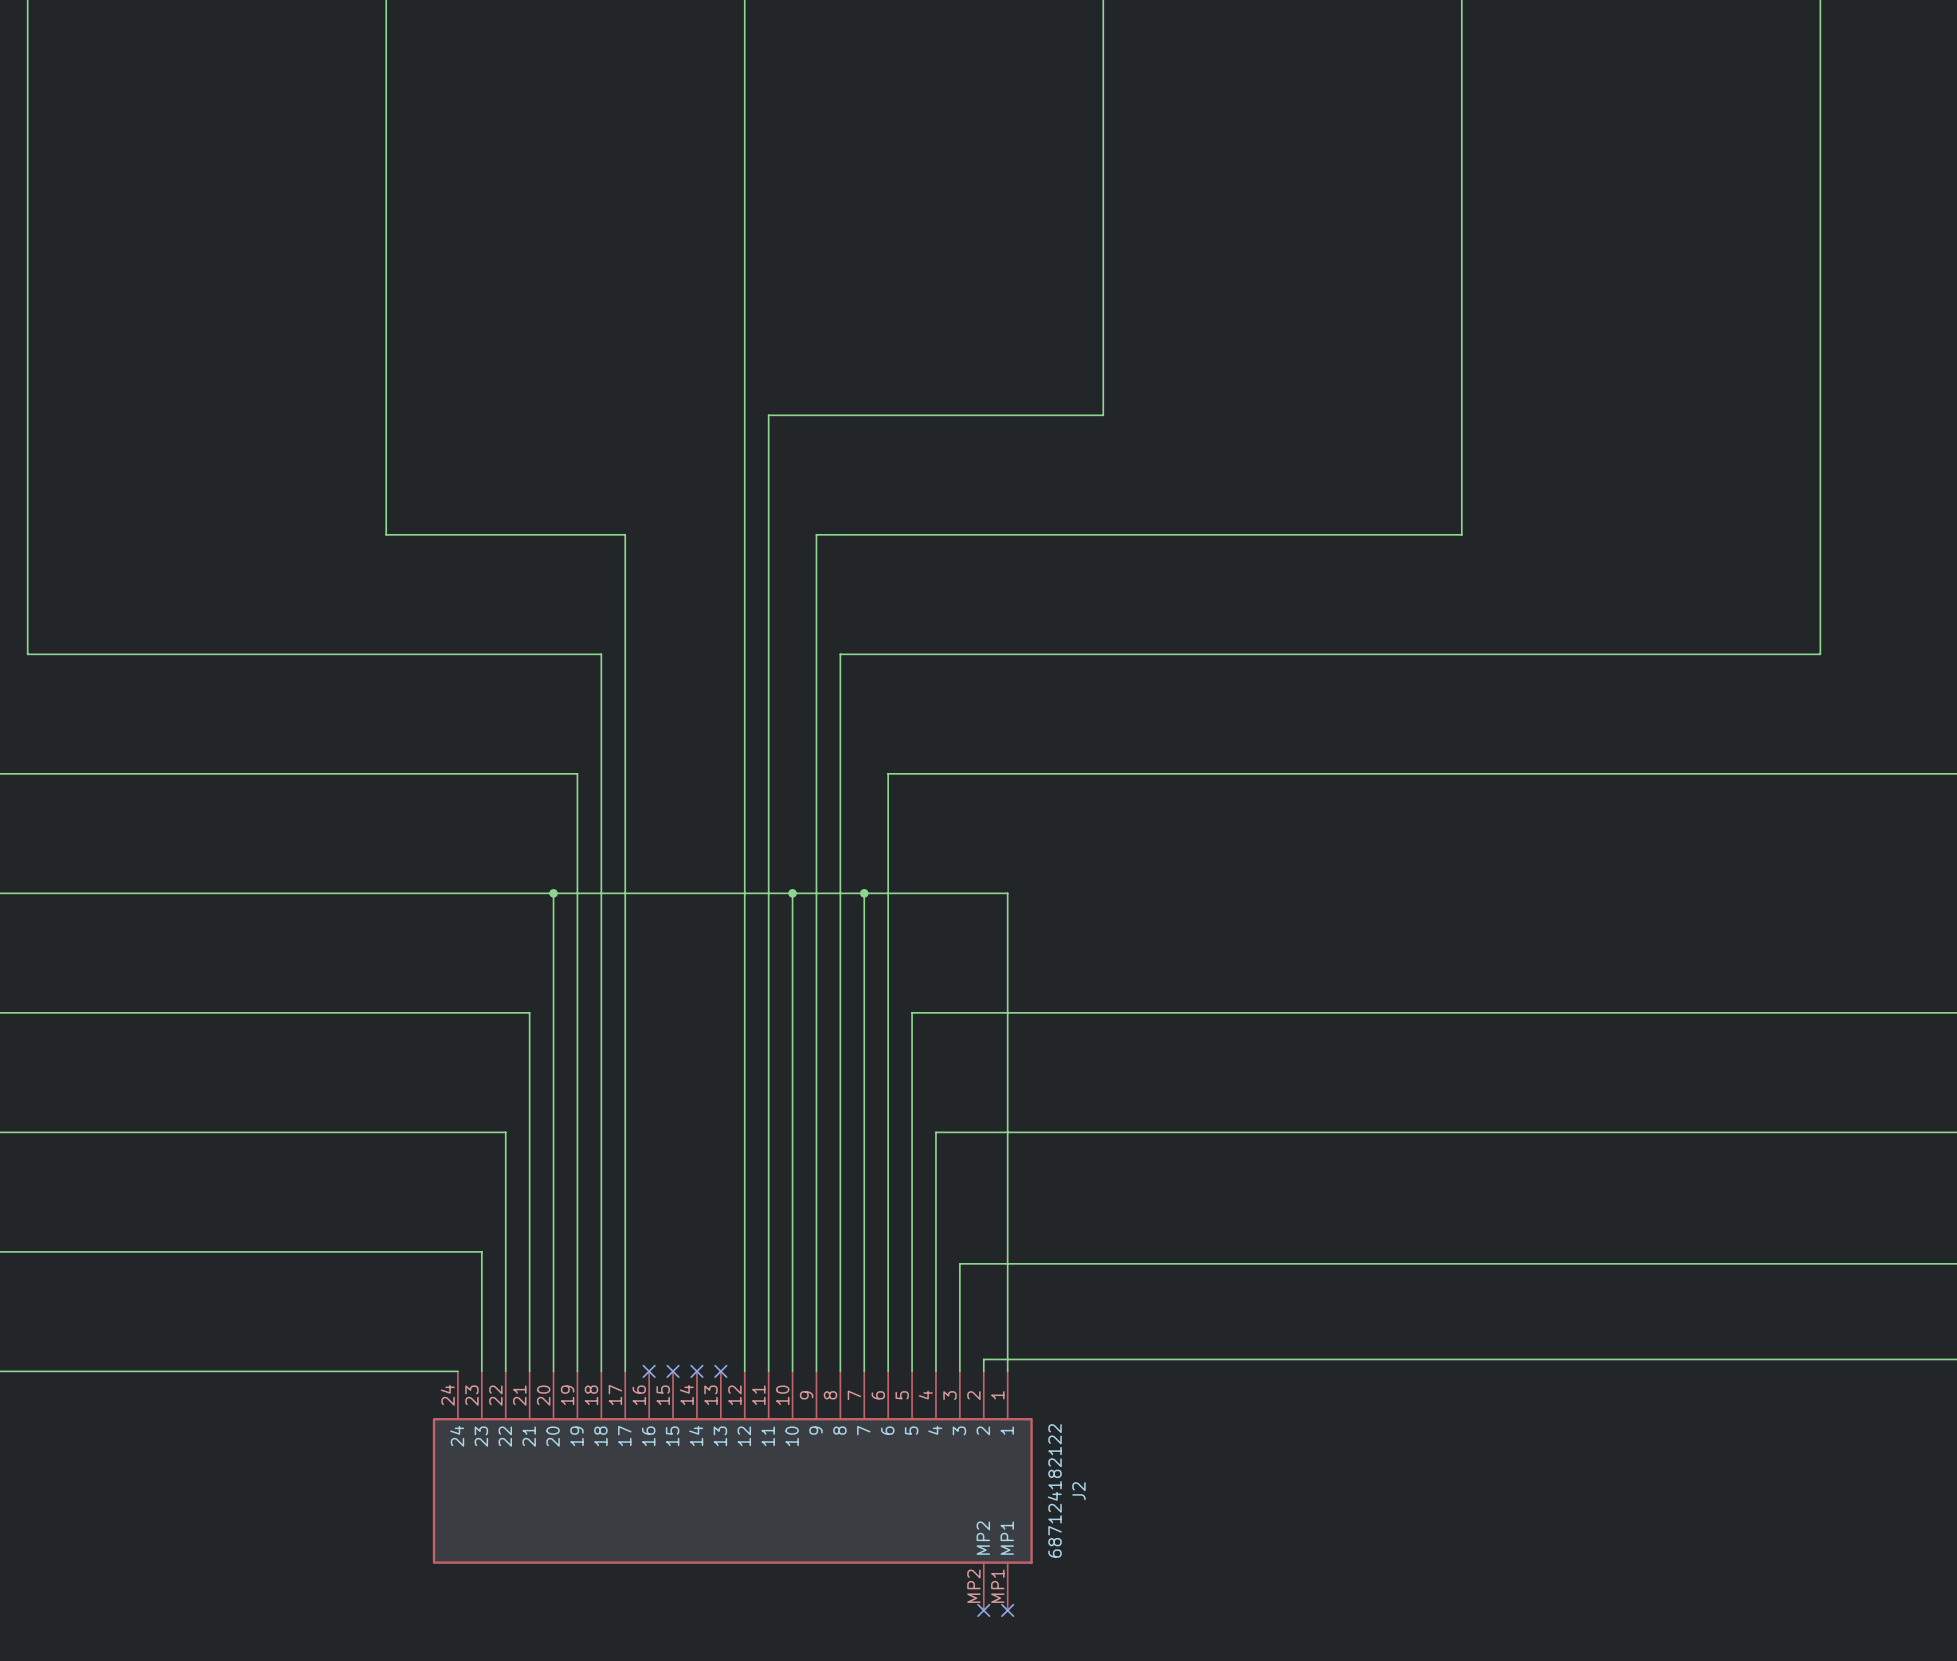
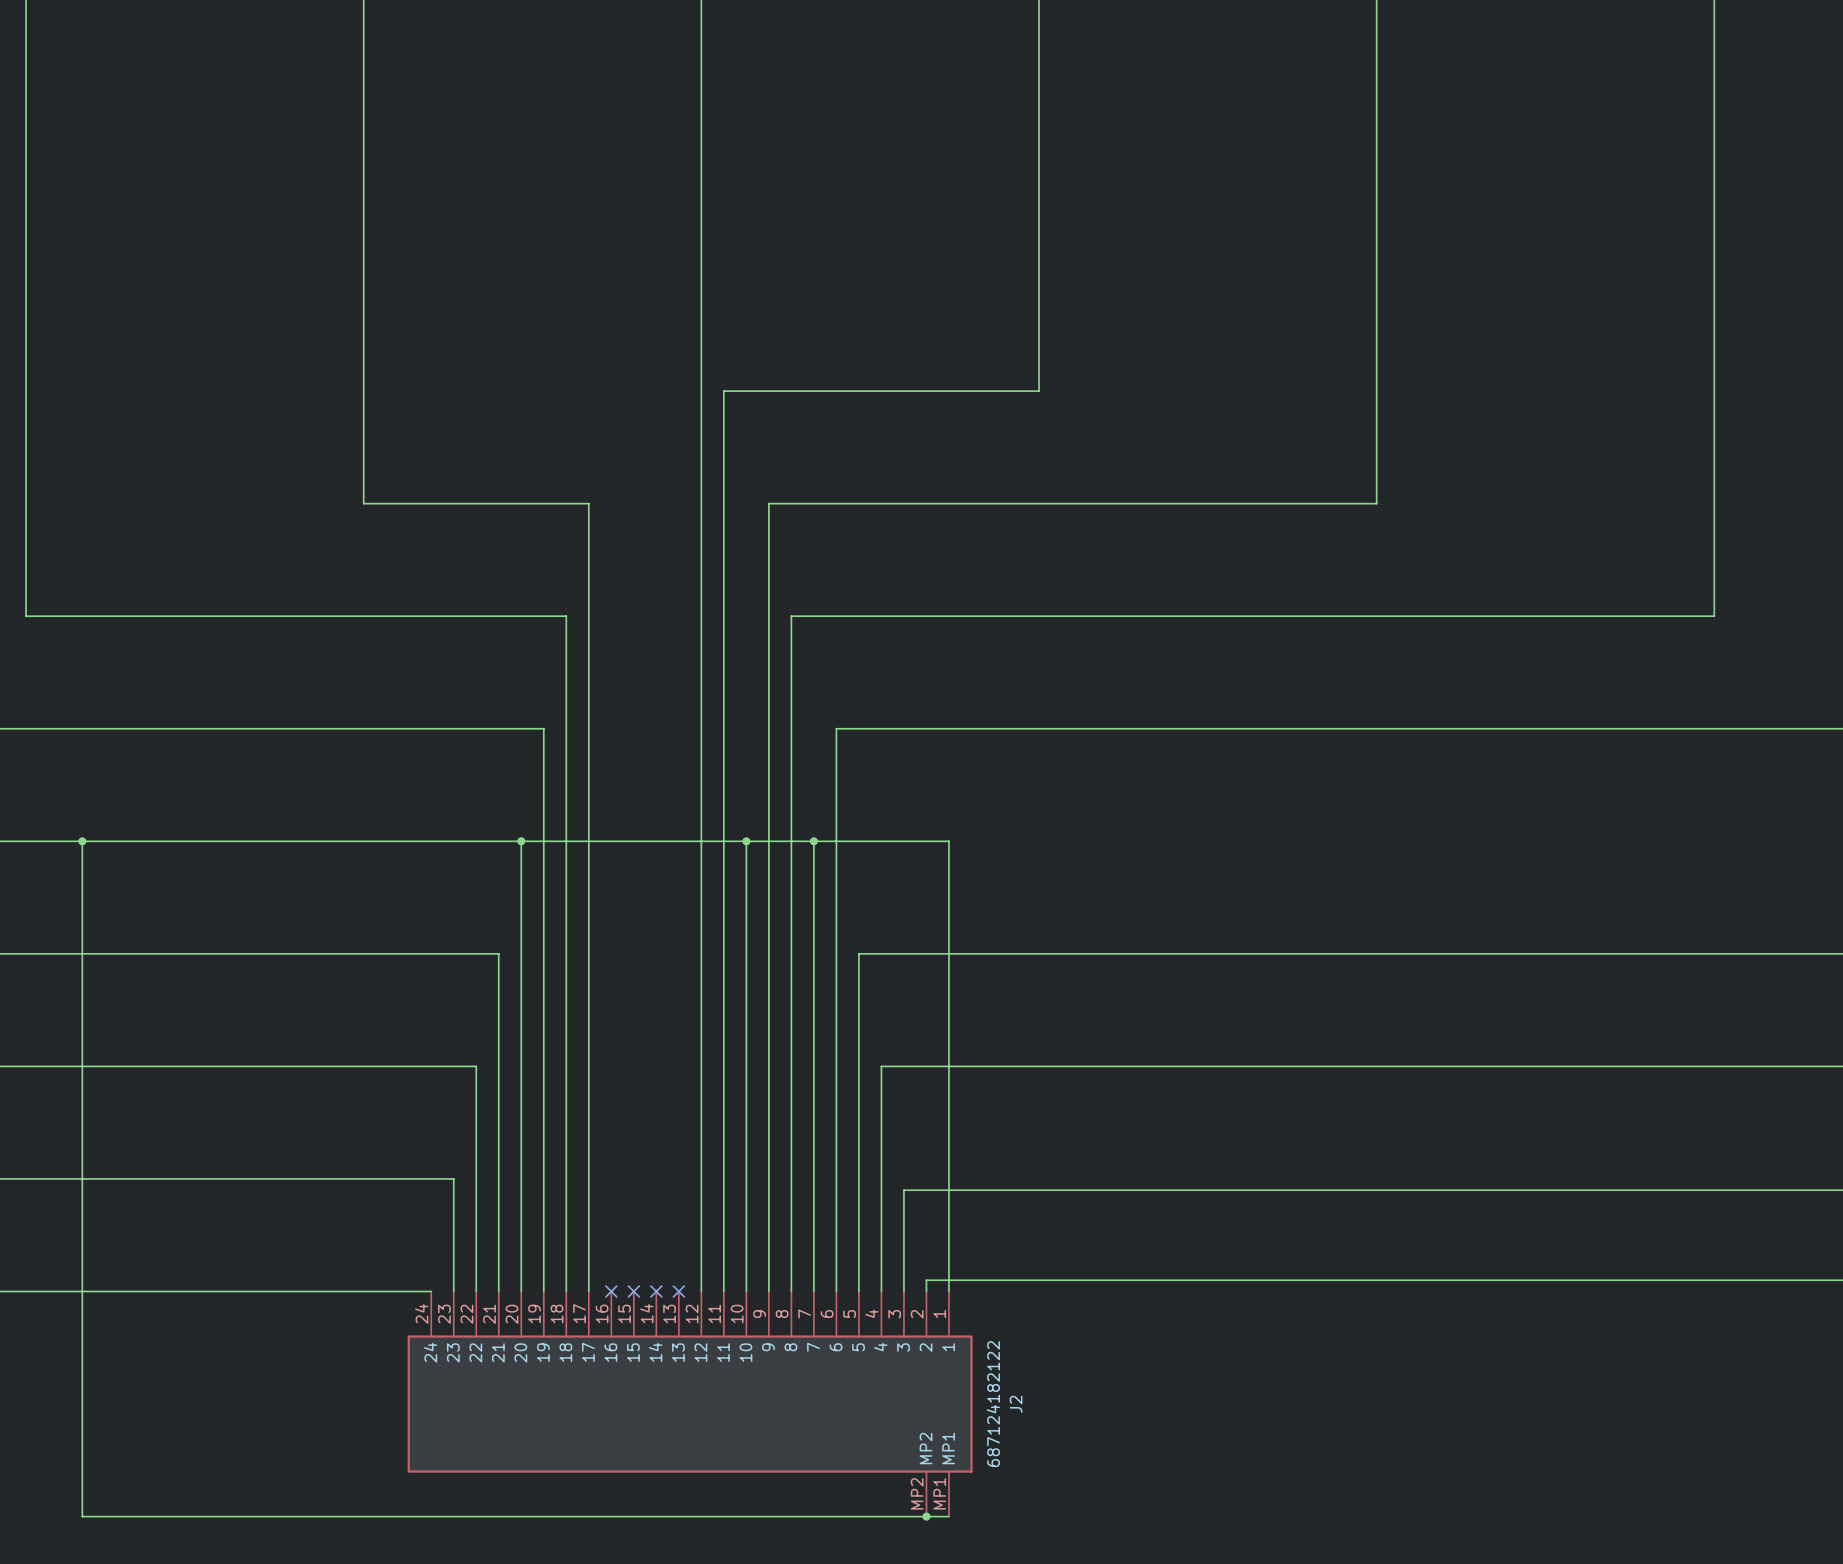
wire: none -> (82, 841) (82, 1516) (948, 1516)
junction: none -> (82, 841)
no-connect mark: (983, 1610) -> none
junction: none -> (926, 1516)
no-connect mark: (1007, 1610) -> none

